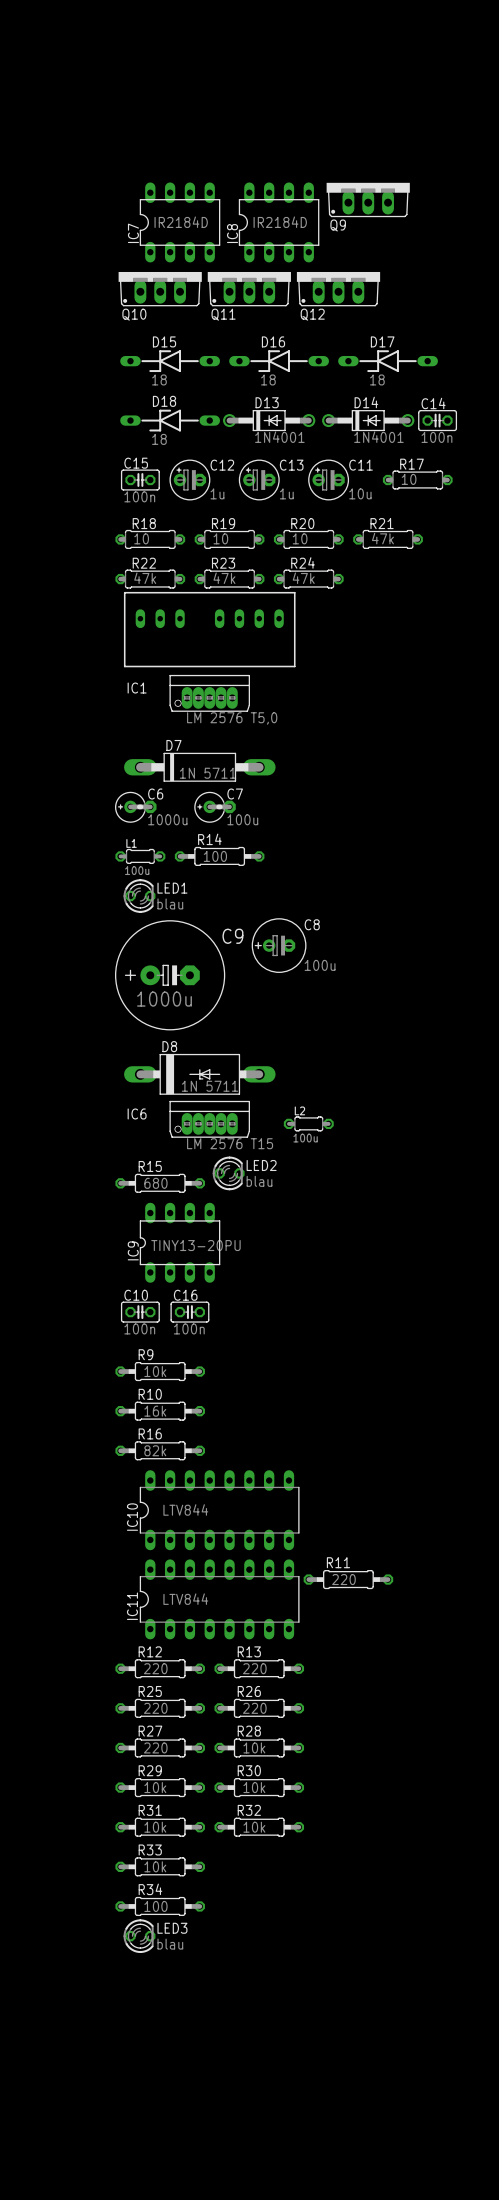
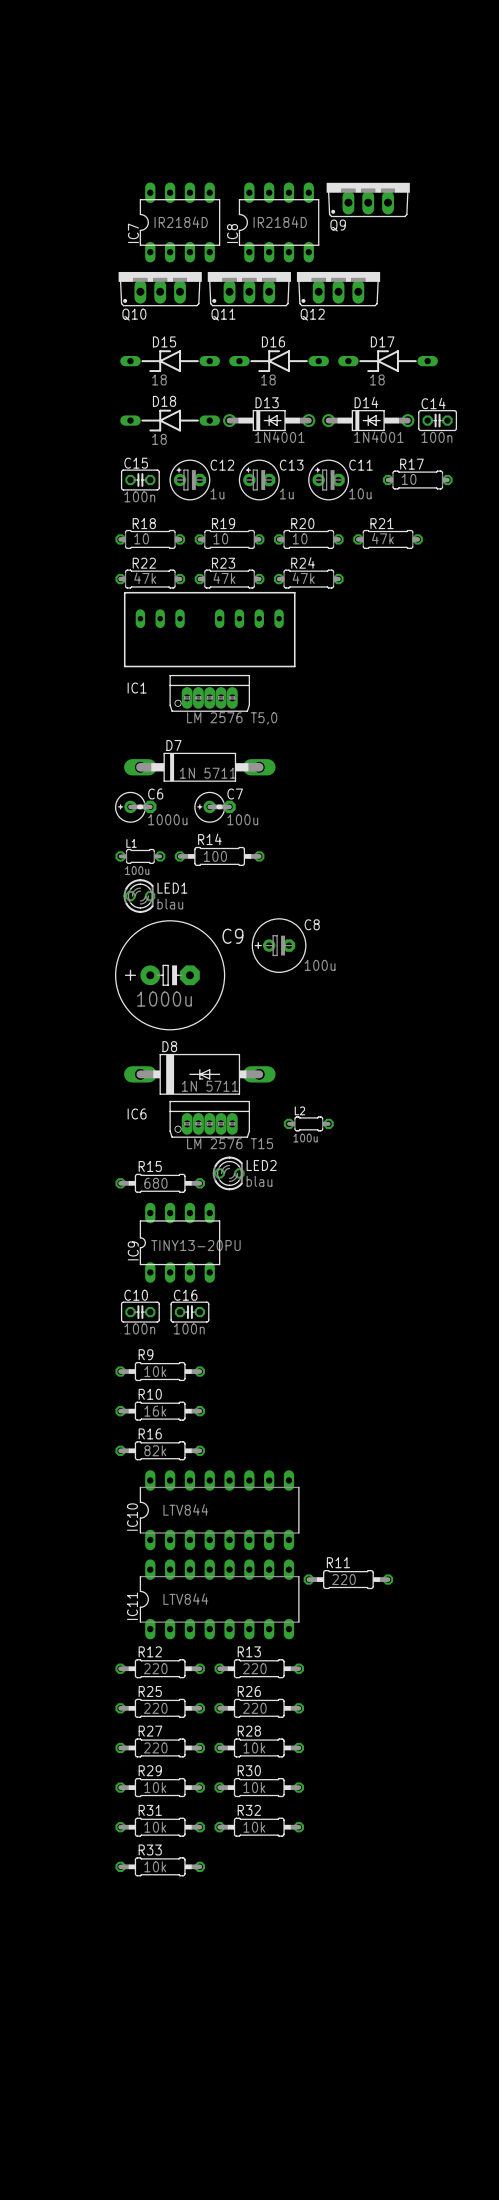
R34: 100 (160, 1906) -> none
LED3: blau (139, 1936) -> none

